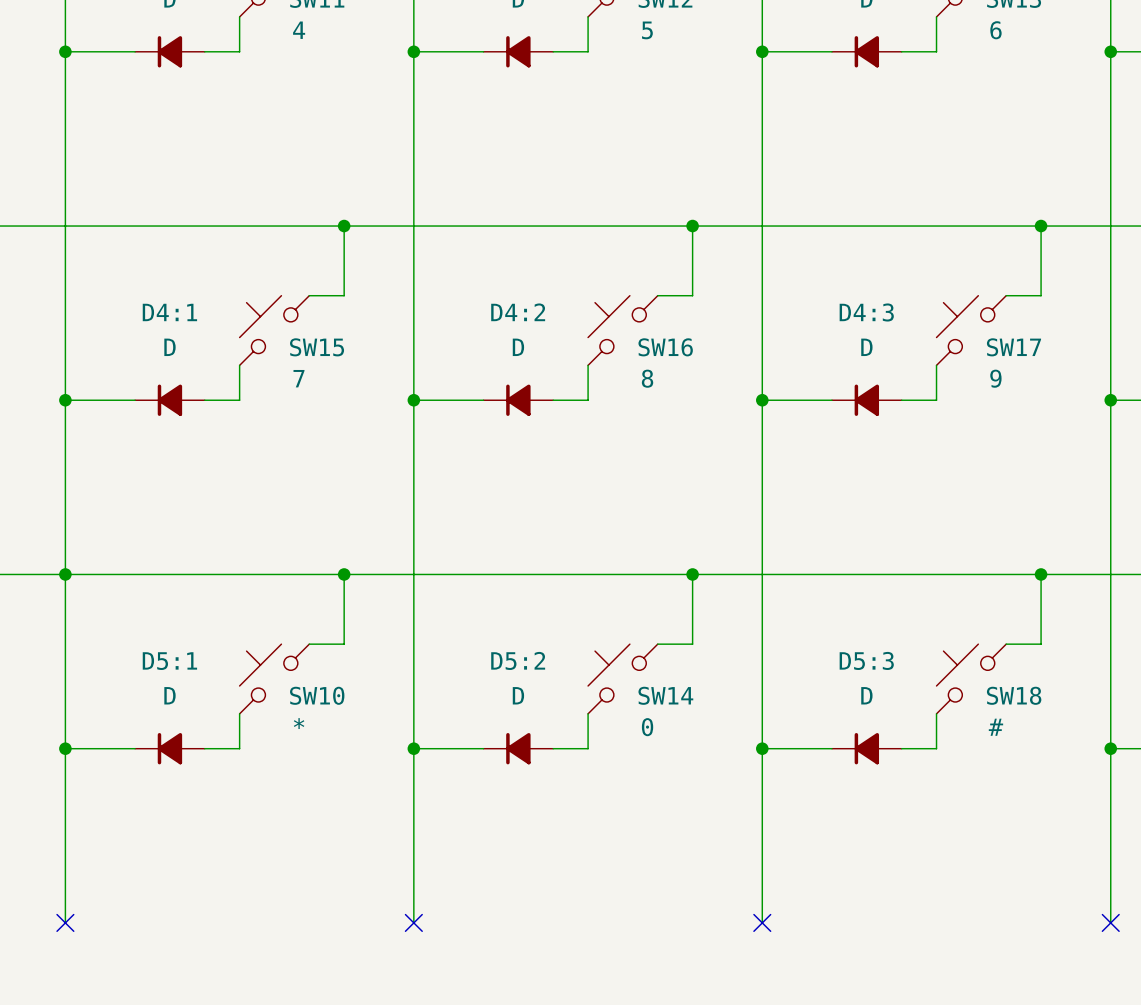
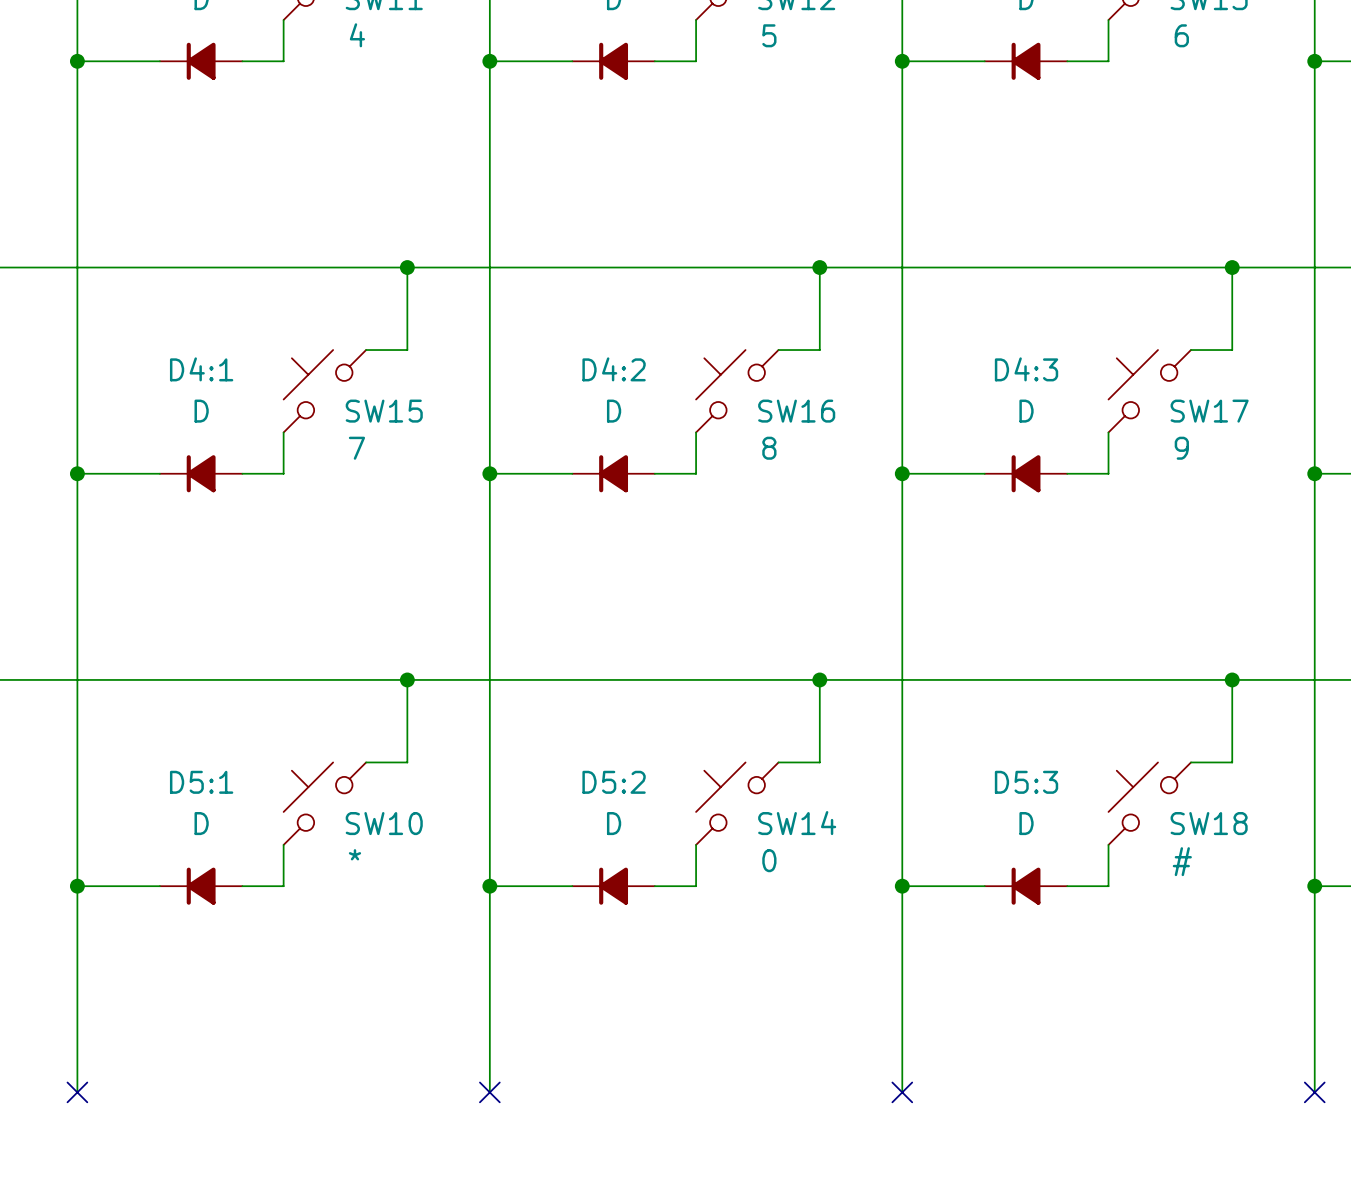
junction: (65, 574) -> none

